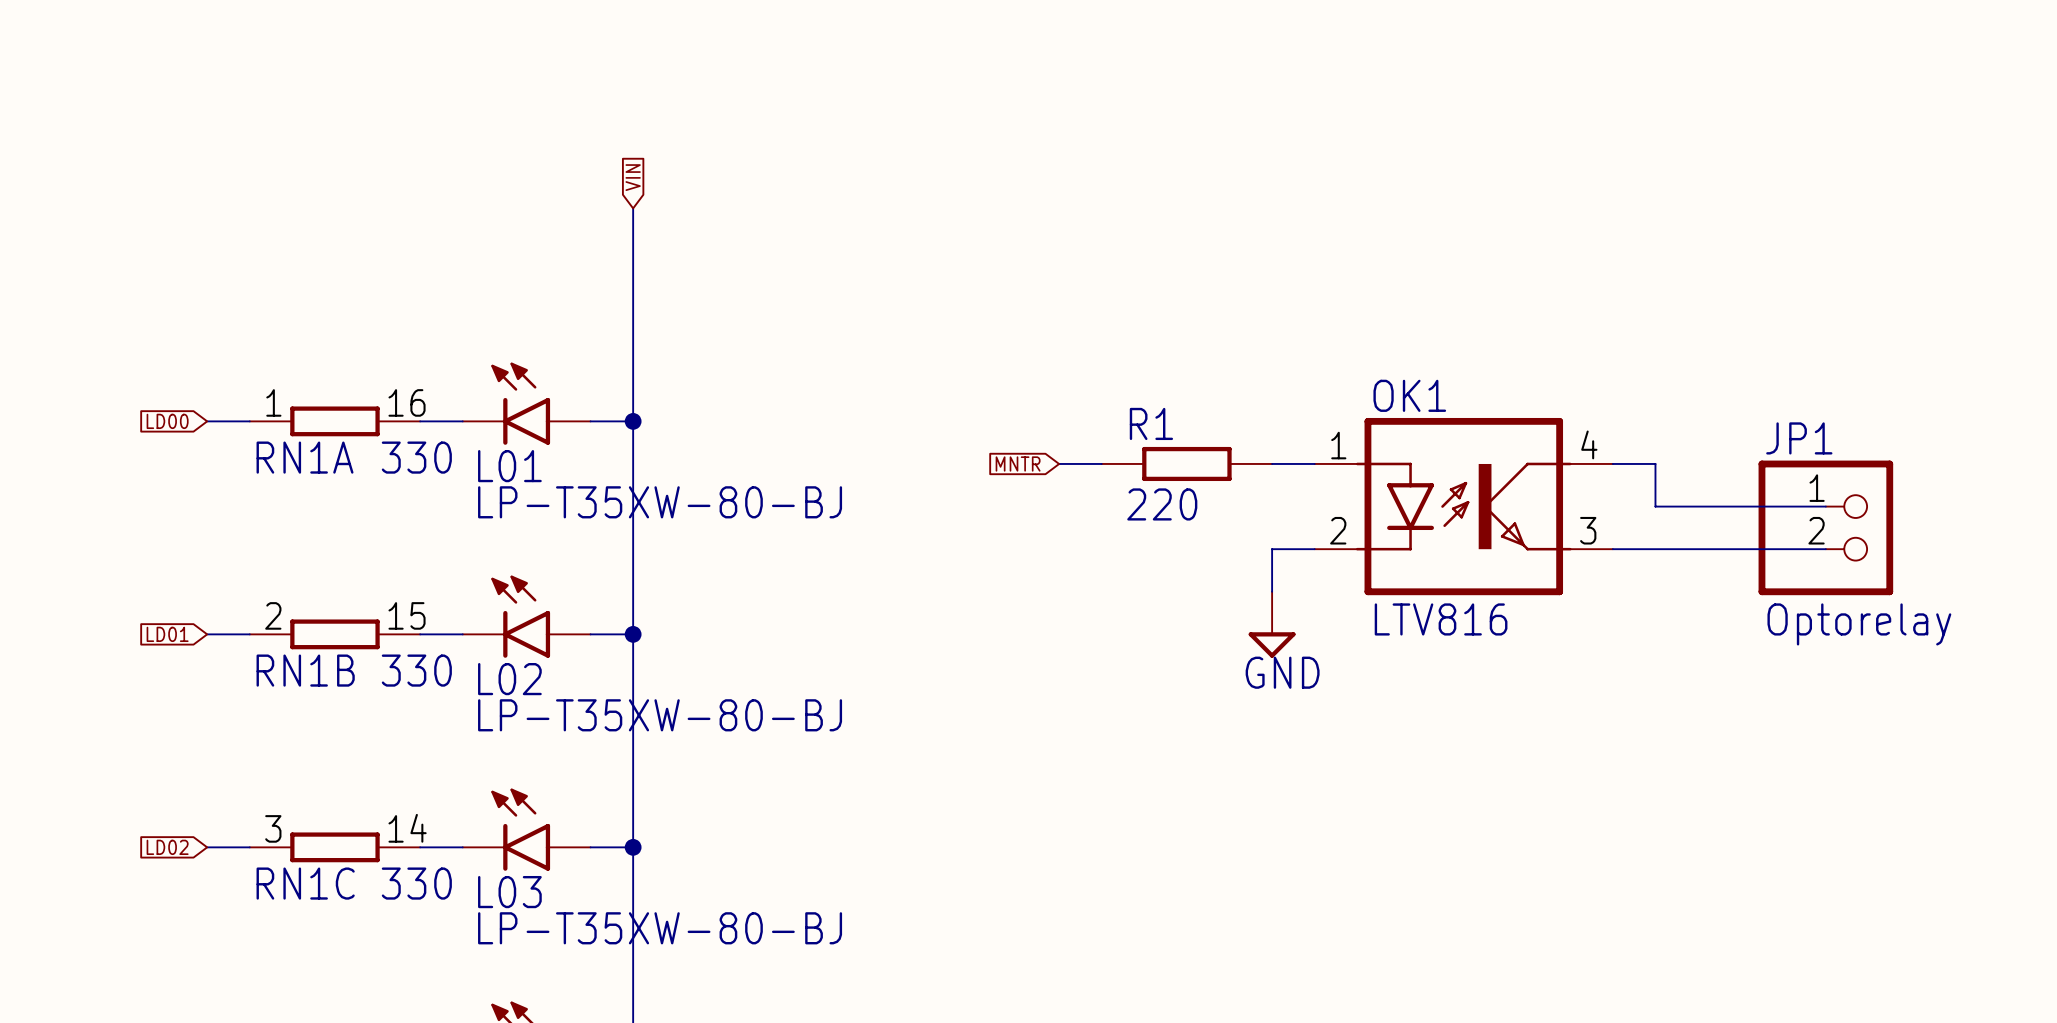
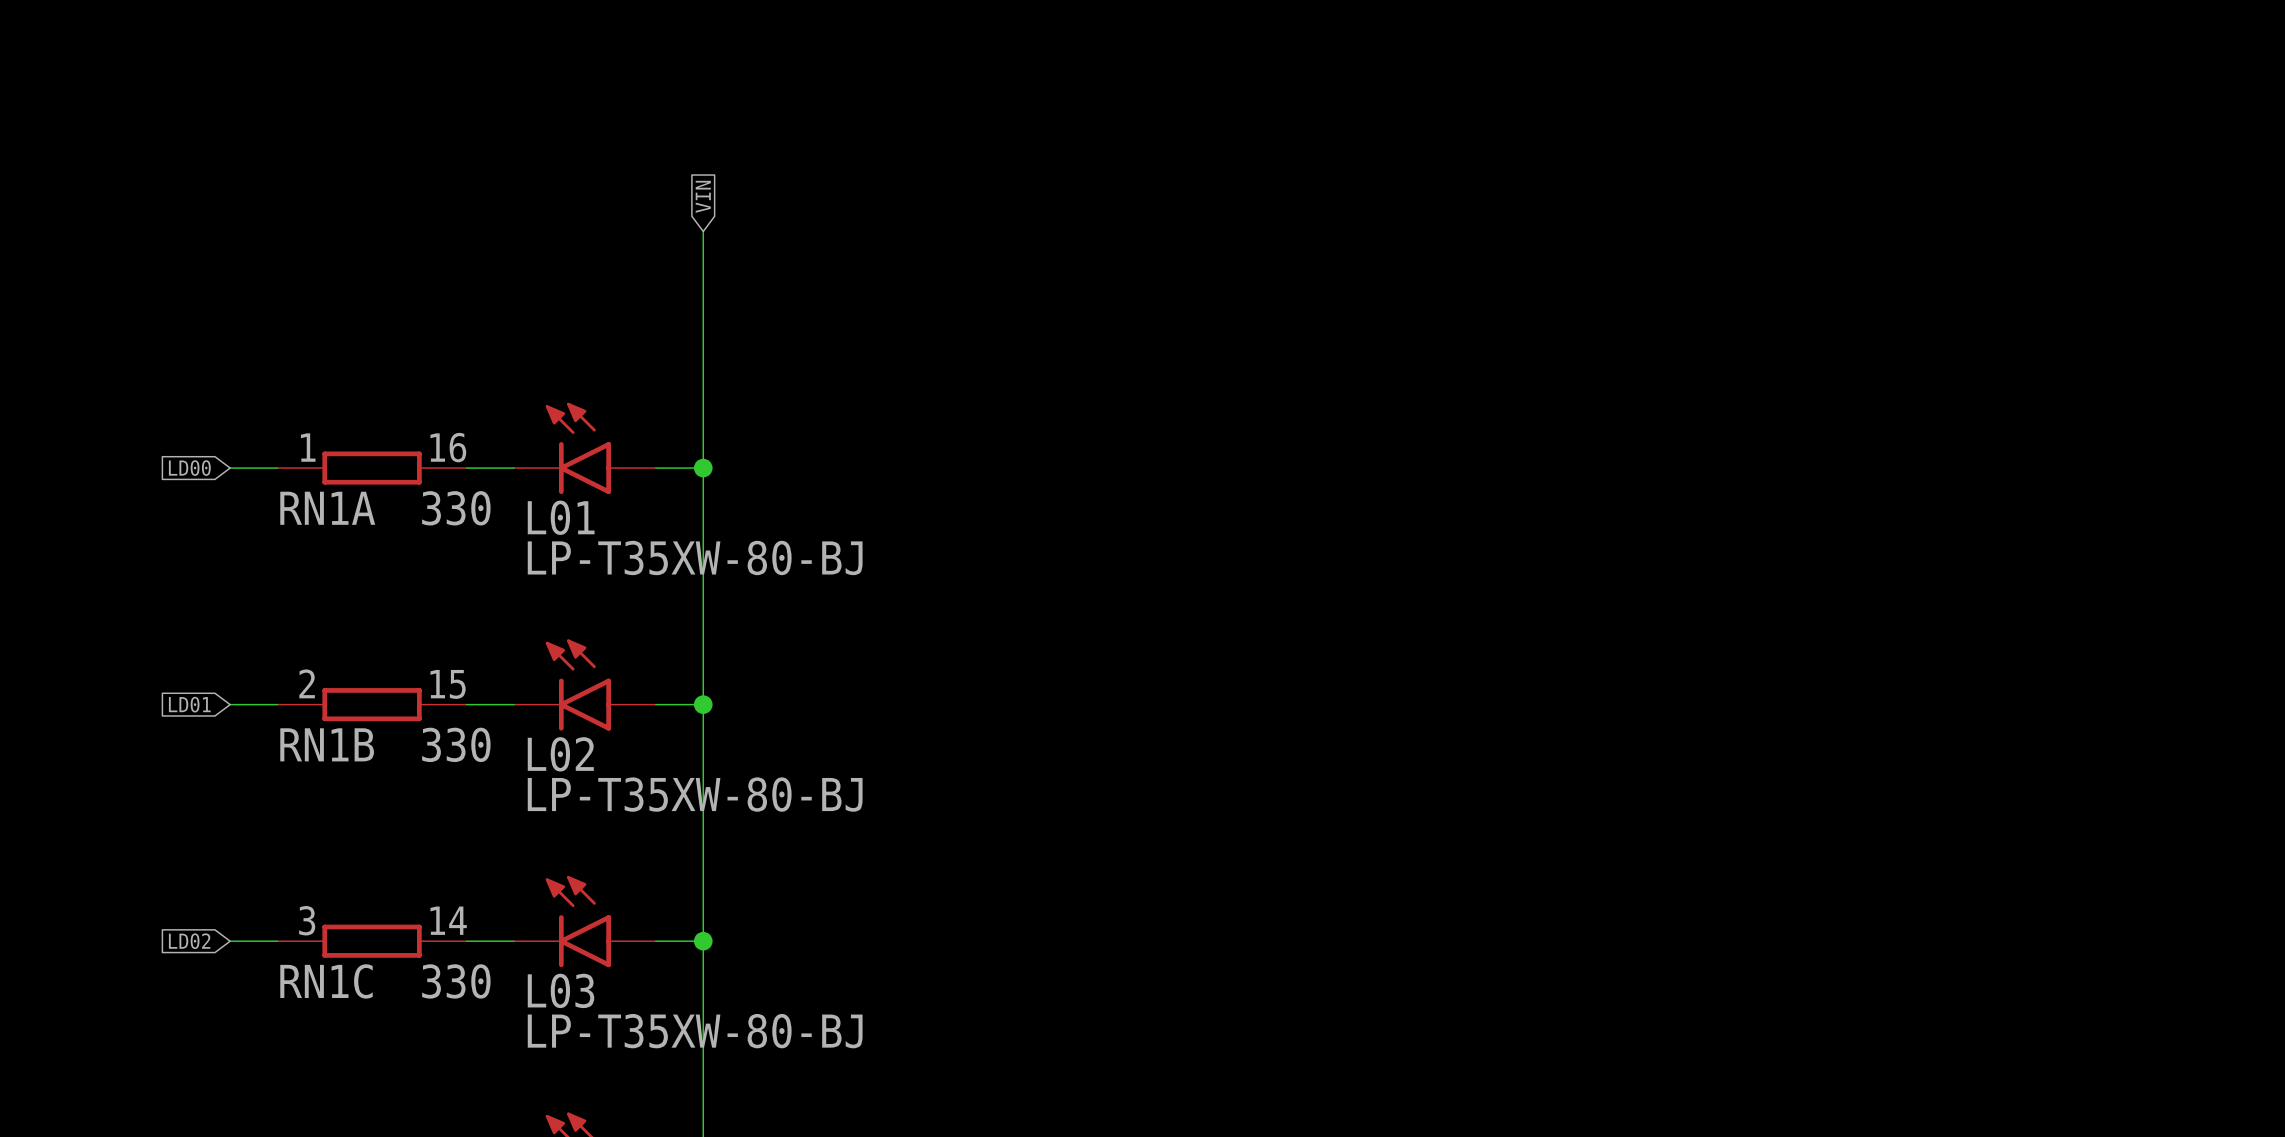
global label: MNTR (1018, 463) -> none
wire: (1059, 463) (1101, 463) -> none
R1: 220 (1186, 463) -> none
wire: (1272, 463) (1314, 463) -> none
wire: (1612, 463) (1655, 463) (1655, 506) (1825, 506) -> none
OK1: LTV816 (1463, 506) -> none
JP1: Optorelay (1825, 527) -> none
wire: (1314, 549) (1272, 549) (1272, 591) -> none
wire: (1612, 549) (1825, 549) -> none
power symbol: GND (1272, 624) -> none

